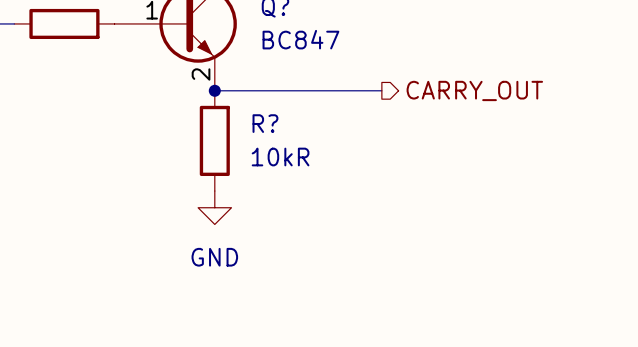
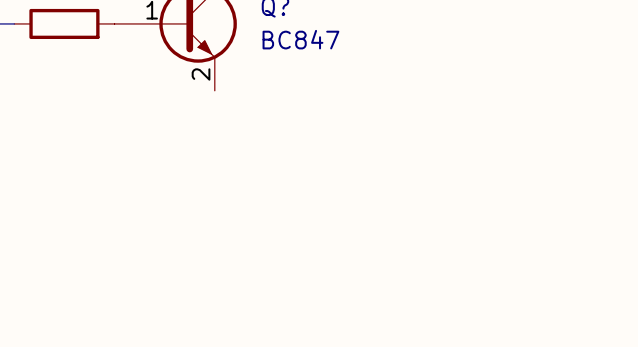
wire: (214, 90) (381, 90) -> none
junction: (214, 90) -> none
hierarchical label: CARRY_OUT (474, 90) -> none
R?: 10kR (214, 140) -> none
power symbol: GND (214, 207) -> none

